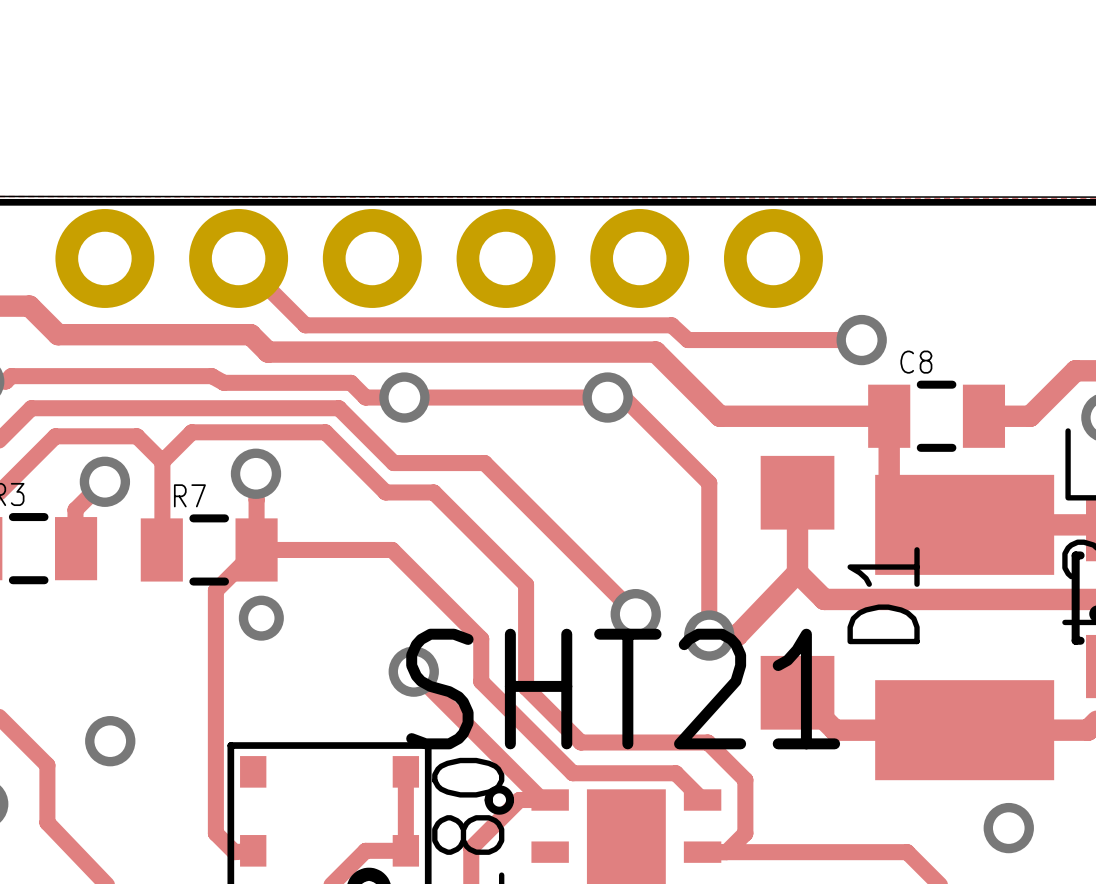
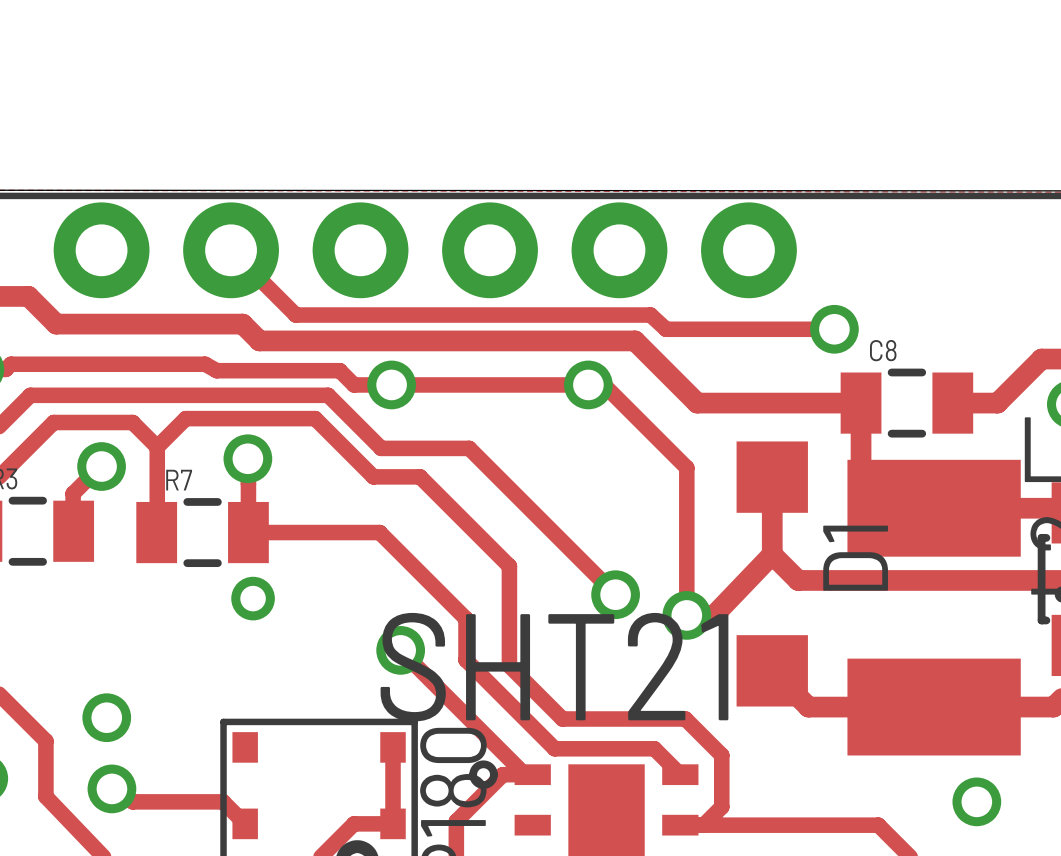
track: (256, 549) (215, 590) (215, 833) (234, 852) (253, 850) -> (111, 788) (119, 788) (132, 801) (223, 801) (245, 823)
via: none -> (111, 788)

